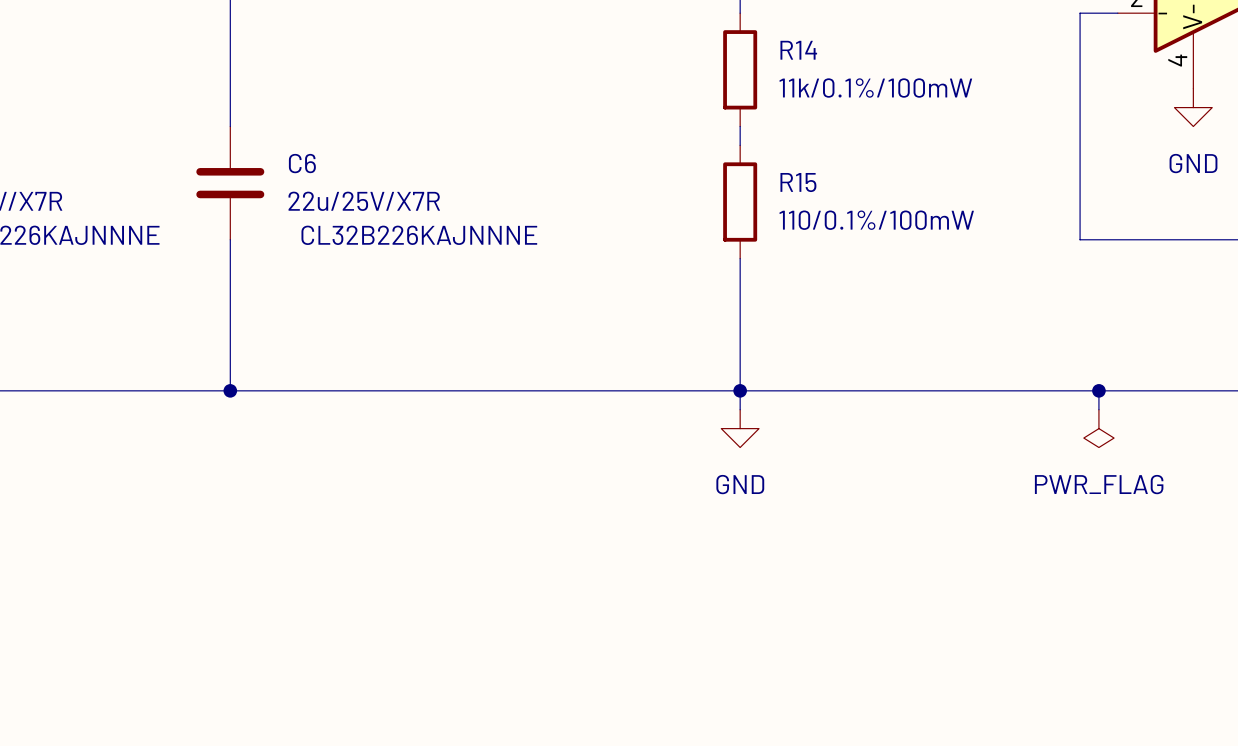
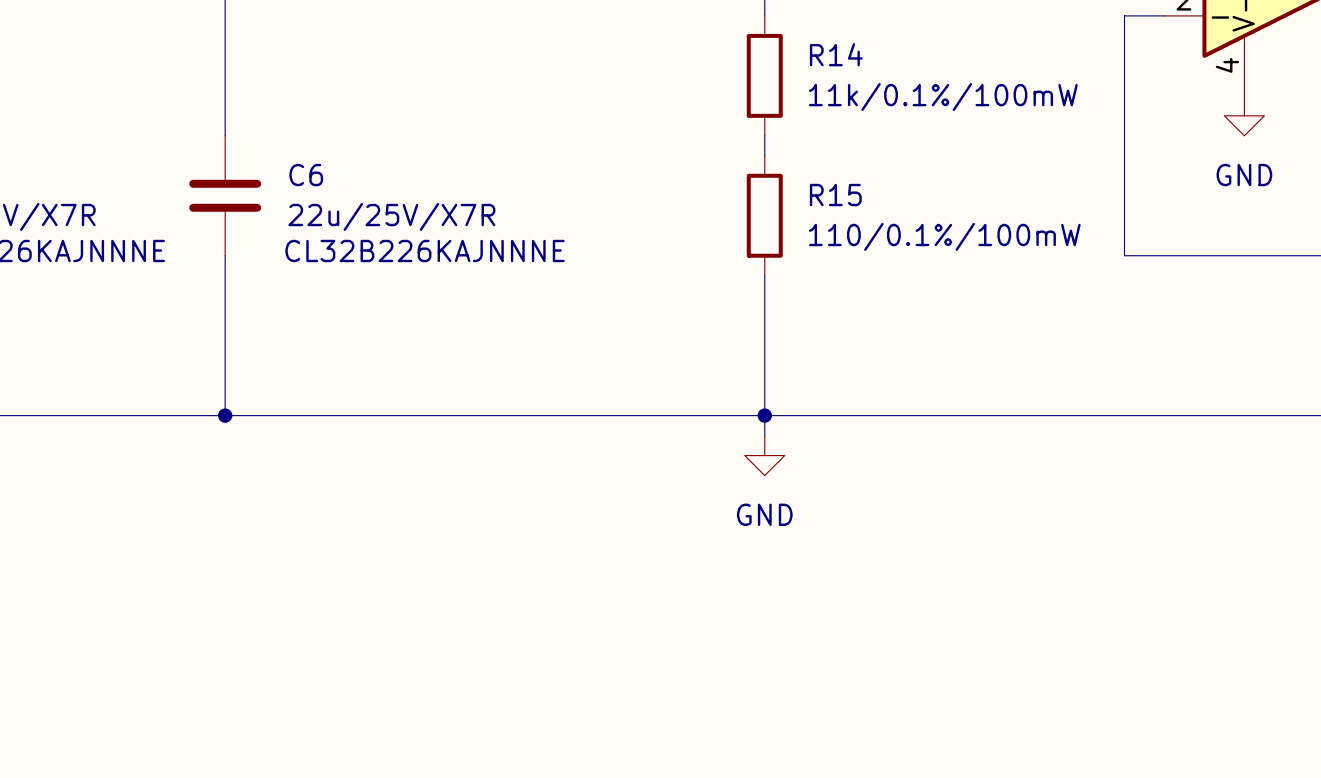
wire: (1098, 390) (1098, 409) -> none
junction: (1098, 390) -> none
power symbol: PWR_FLAG (1098, 428) -> none

